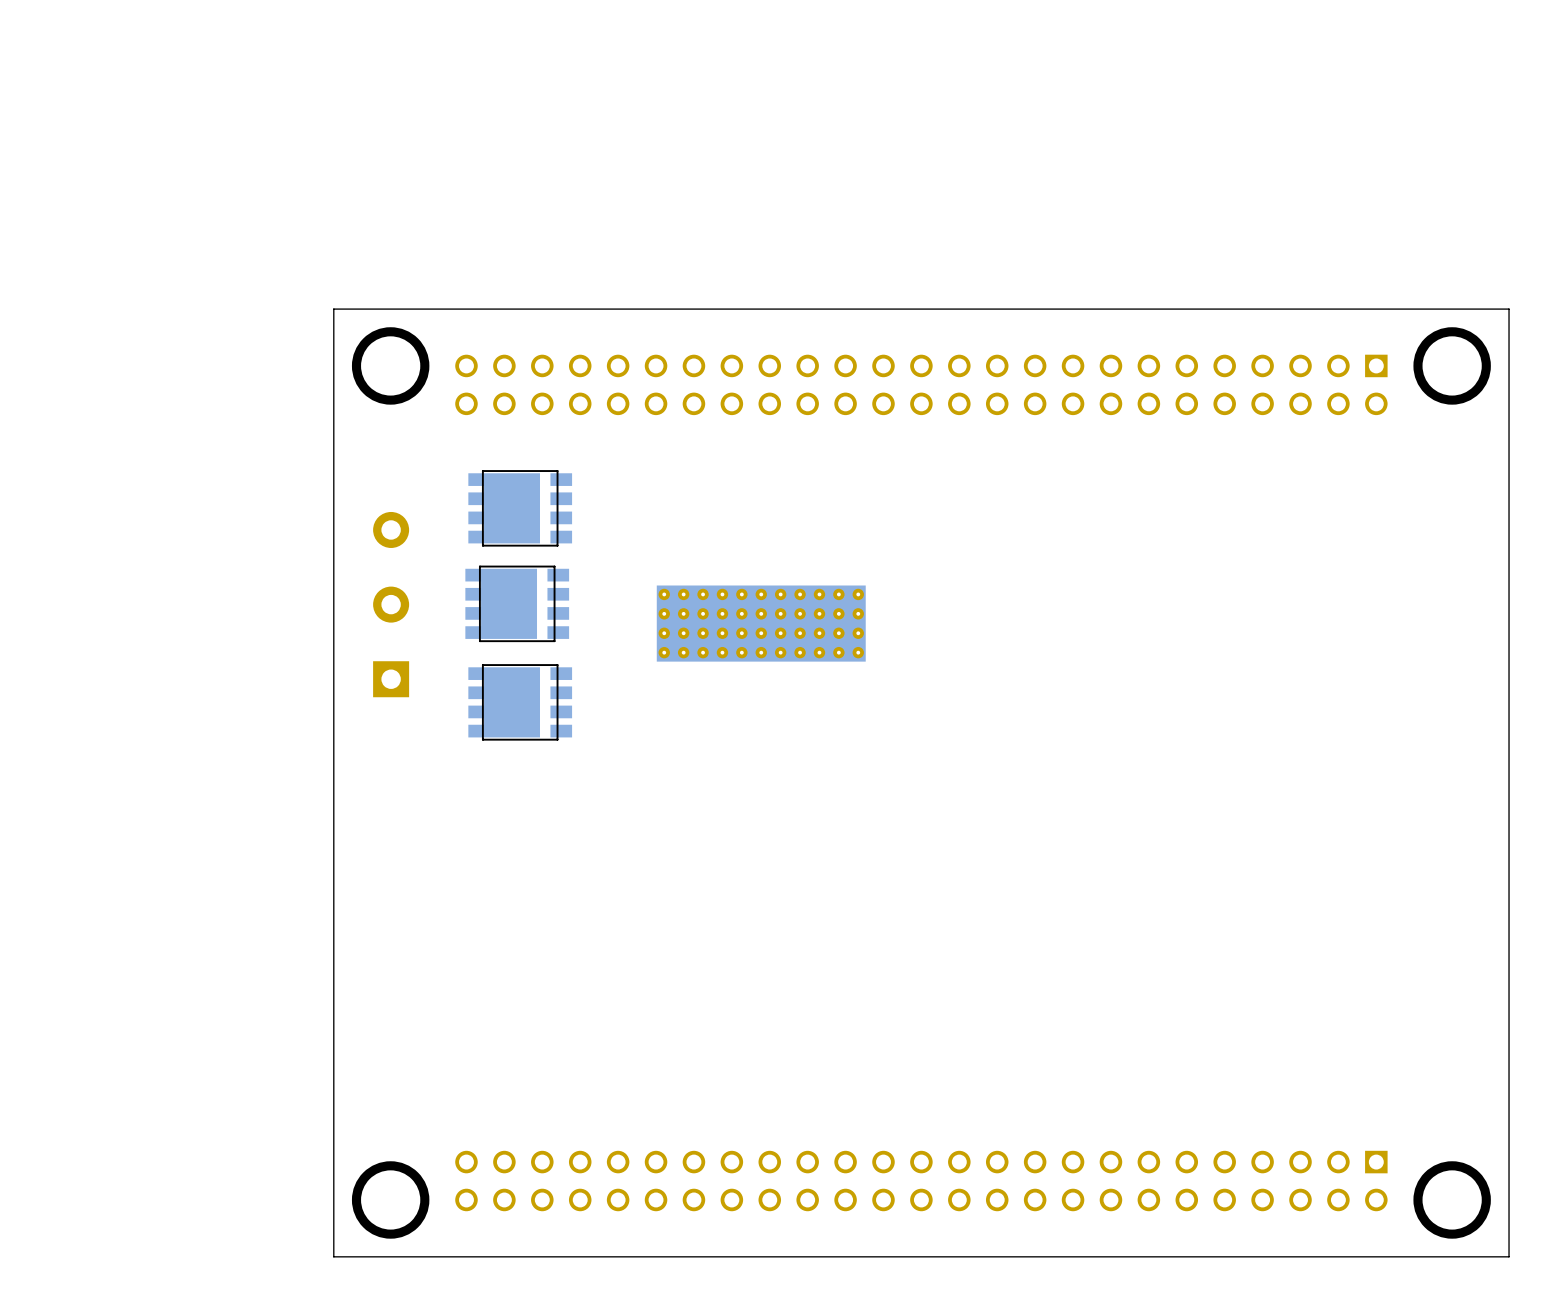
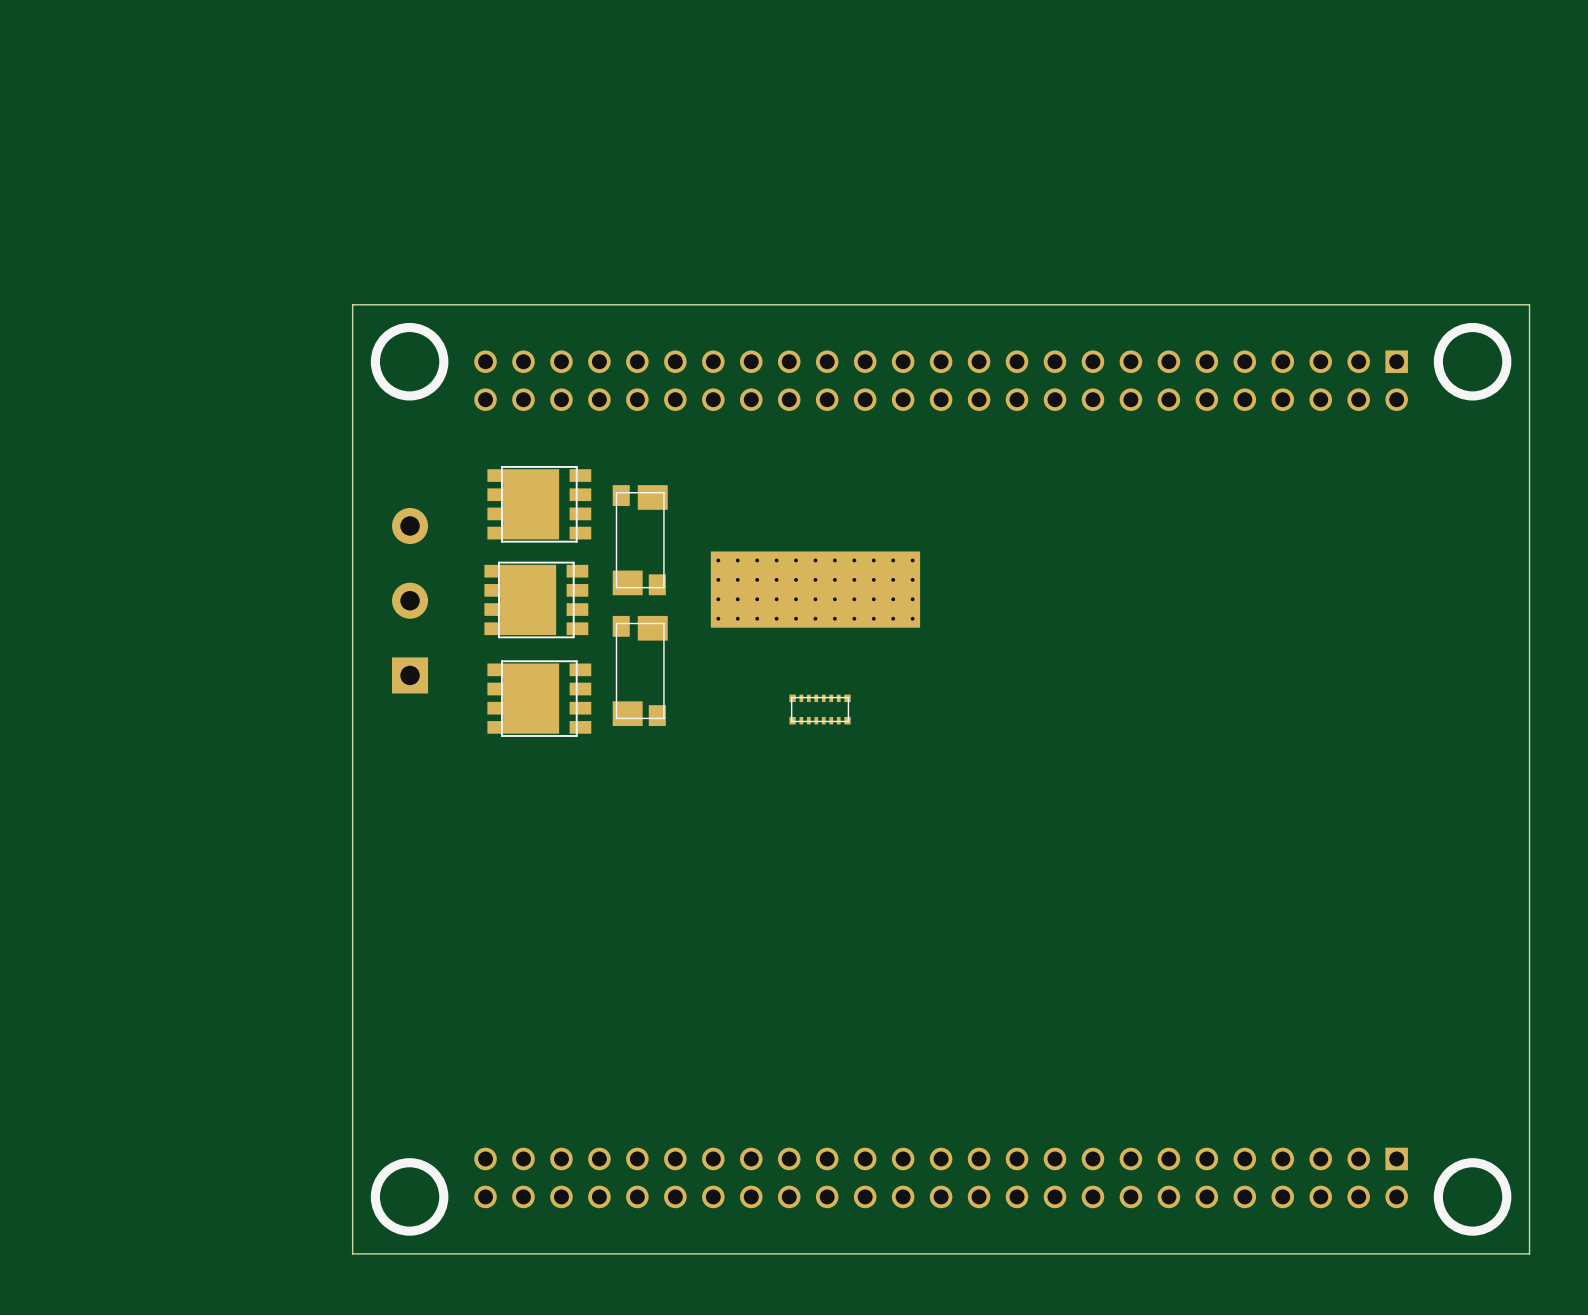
part: none -> (640, 540)
part position: (761, 623) -> (815, 589)
part: none -> (640, 670)
part: none -> (820, 709)

